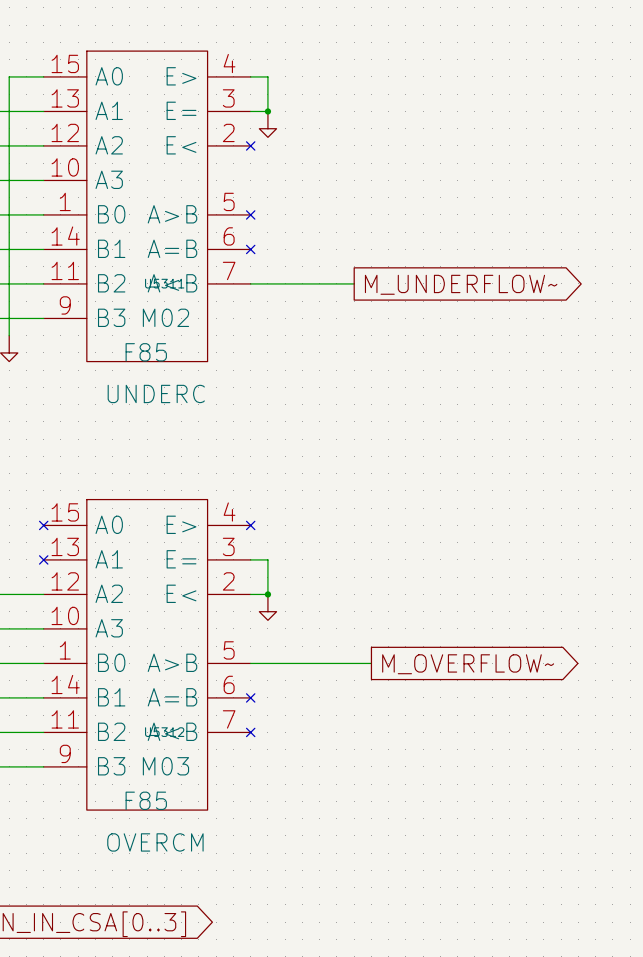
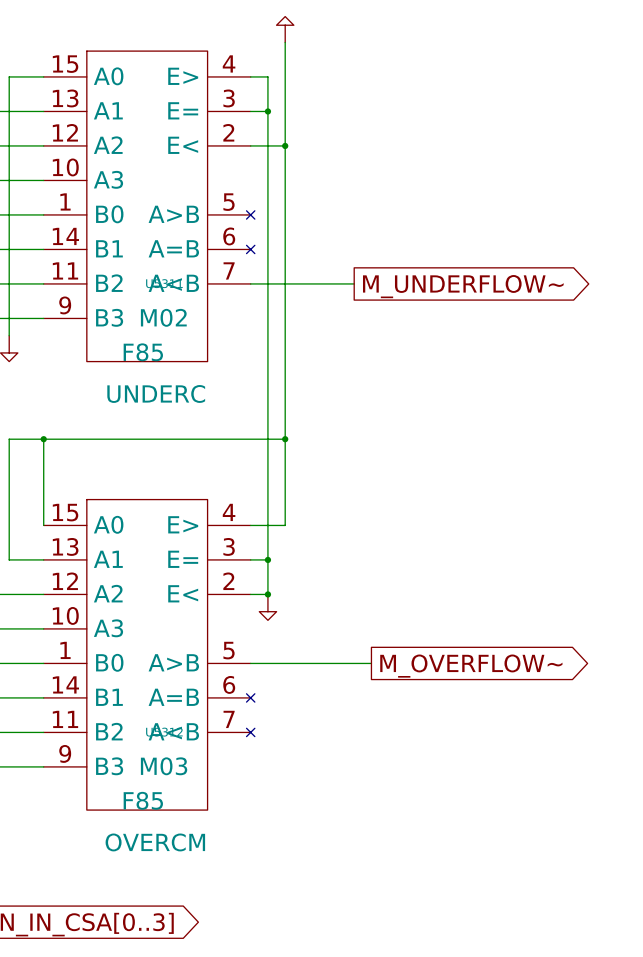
wire: none -> (285, 42) (285, 525) (250, 525)
wire: none -> (267, 111) (267, 559)
power symbol position: (267, 124) -> (285, 29)
power symbol rotation: 0° (267, 133) -> 180° (285, 20)
wire: none -> (250, 145) (285, 145)
no-connect mark: (250, 145) -> none
junction: none -> (285, 145)
wire: none -> (43, 439) (43, 525)
junction: none -> (43, 439)
wire: none -> (285, 439) (9, 439) (9, 559) (43, 559)
junction: none -> (285, 439)
no-connect mark: (43, 525) -> none
no-connect mark: (250, 525) -> none
no-connect mark: (43, 559) -> none
junction: none -> (267, 559)

